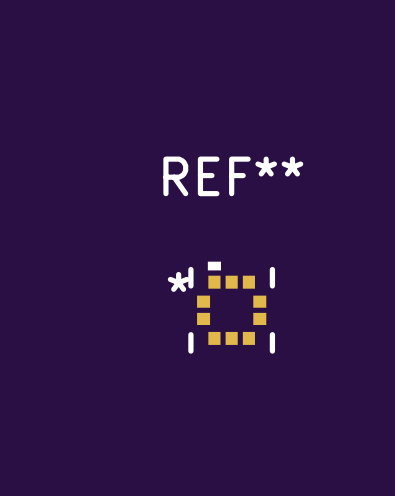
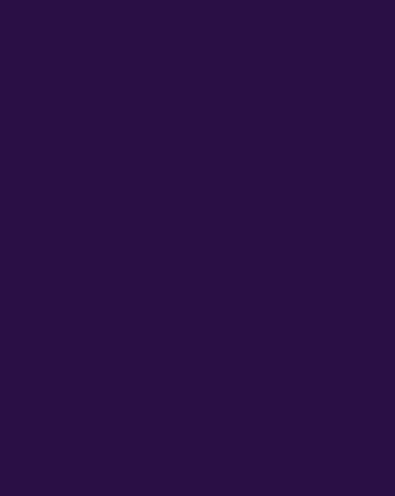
REF**: (231, 307) -> none

